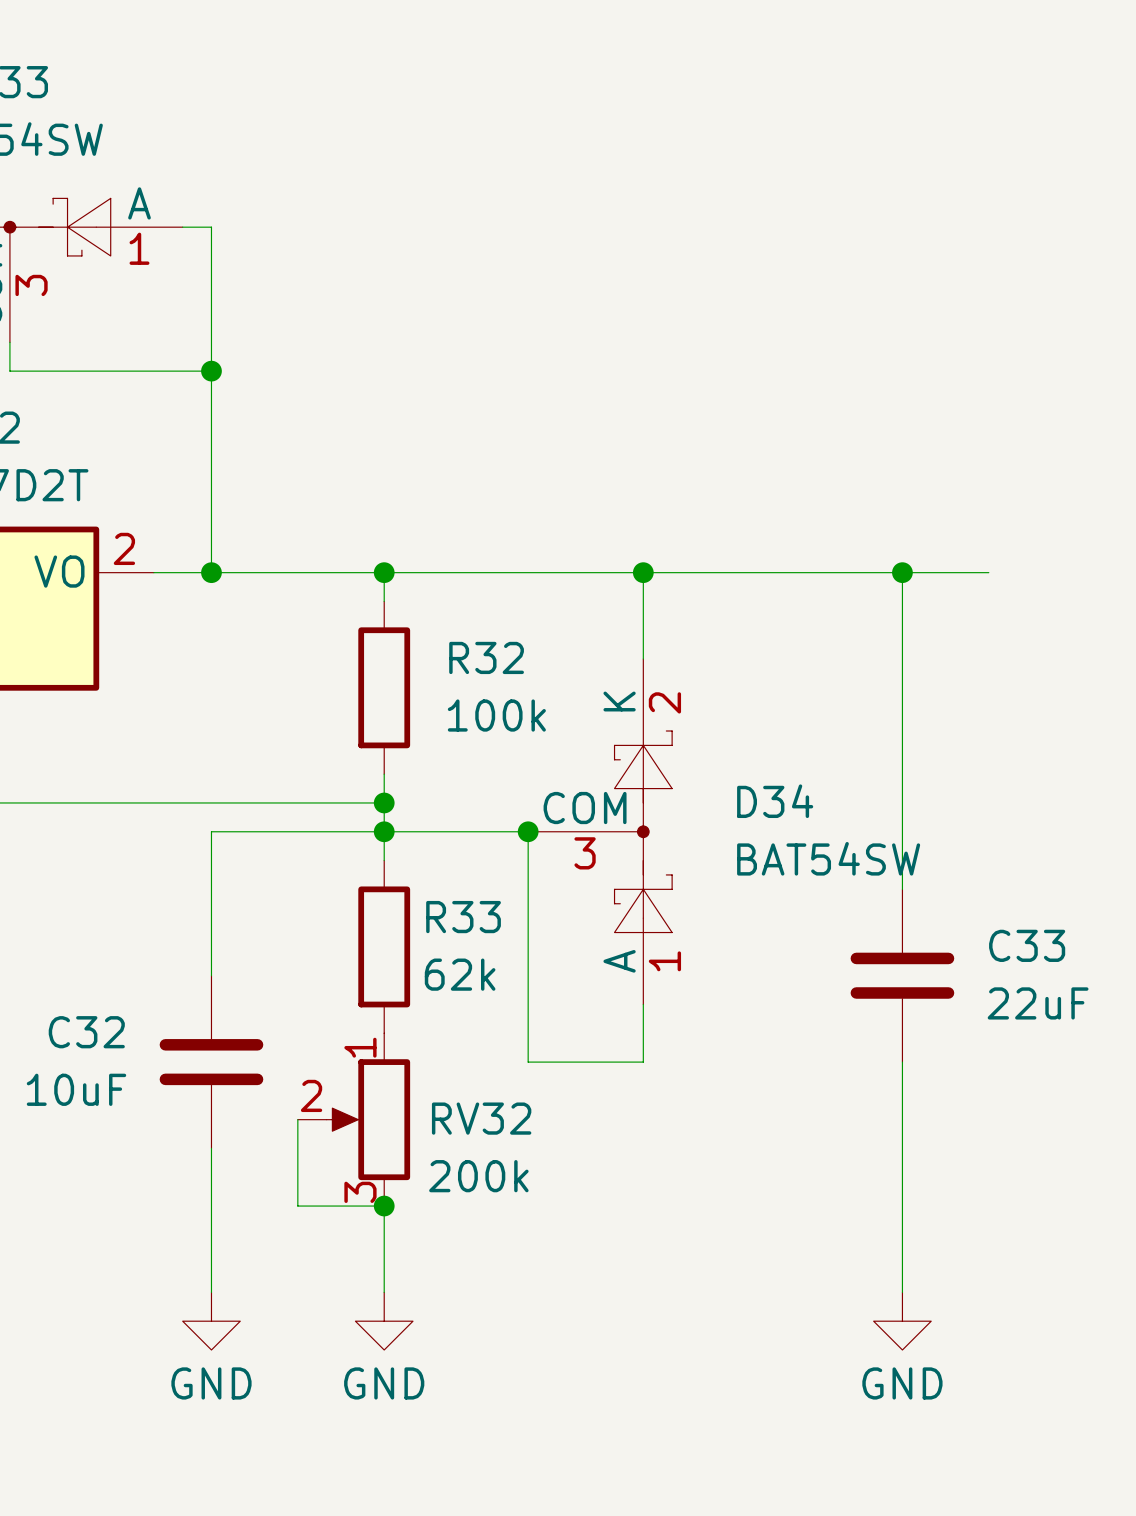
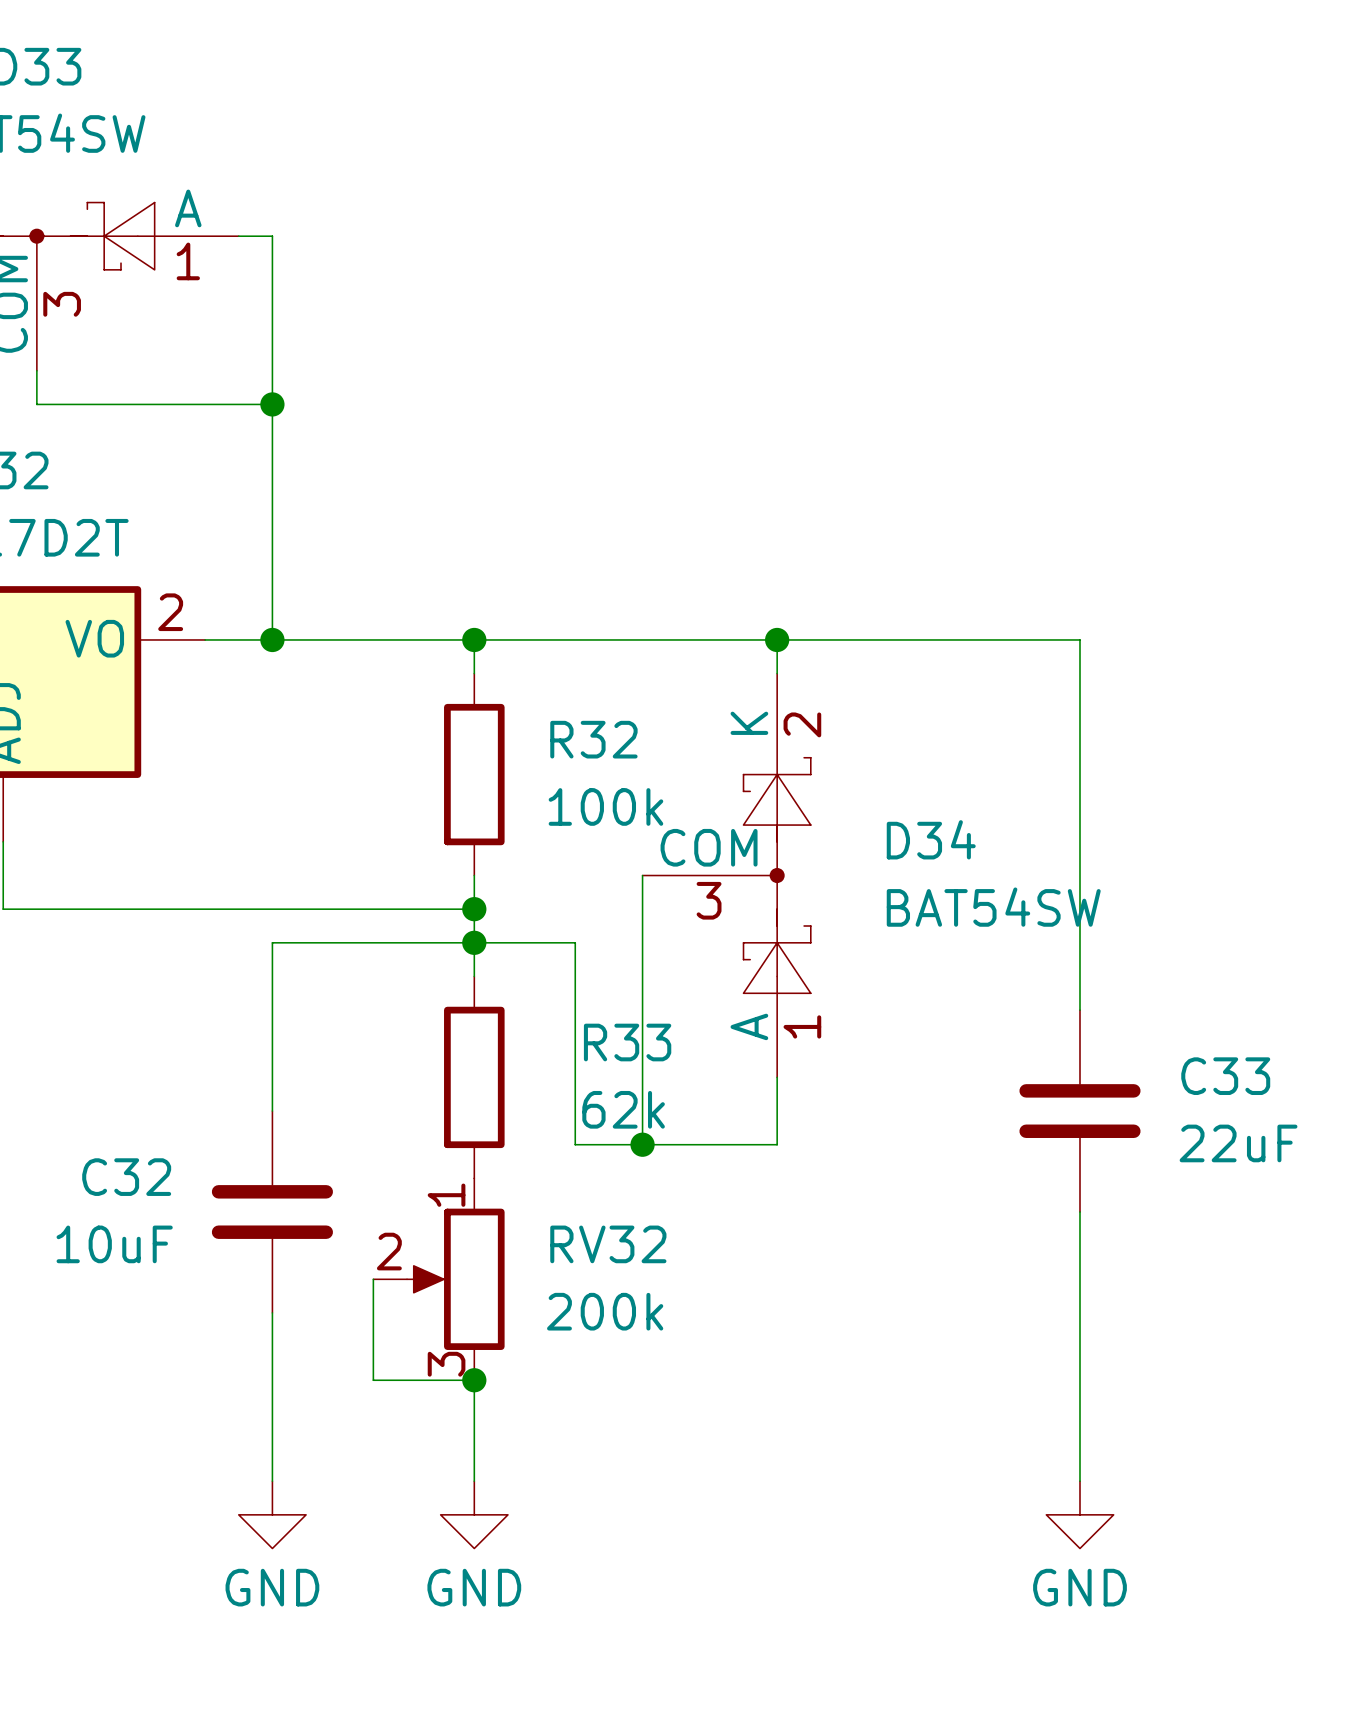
wire: (902, 572) (988, 572) -> none
junction: (902, 572) -> none
wire: (470, 831) (528, 831) -> (642, 875) (642, 942)
wire: none -> (575, 942) (575, 1144) (777, 1144) (777, 1077)
junction: (528, 831) -> none
D34 position: (600, 831) -> (726, 875)
R33 name position: R33 (463, 917) -> R33 (627, 1042)
R33 value position: 62k (460, 974) -> 62k (623, 1109)
wire: (528, 1004) (528, 1062) (643, 1062) (643, 1004) -> none
junction: none -> (642, 1144)
RV32 name position: RV32 (481, 1118) -> RV32 (608, 1244)
RV32 value position: 200k (478, 1176) -> 200k (605, 1311)

